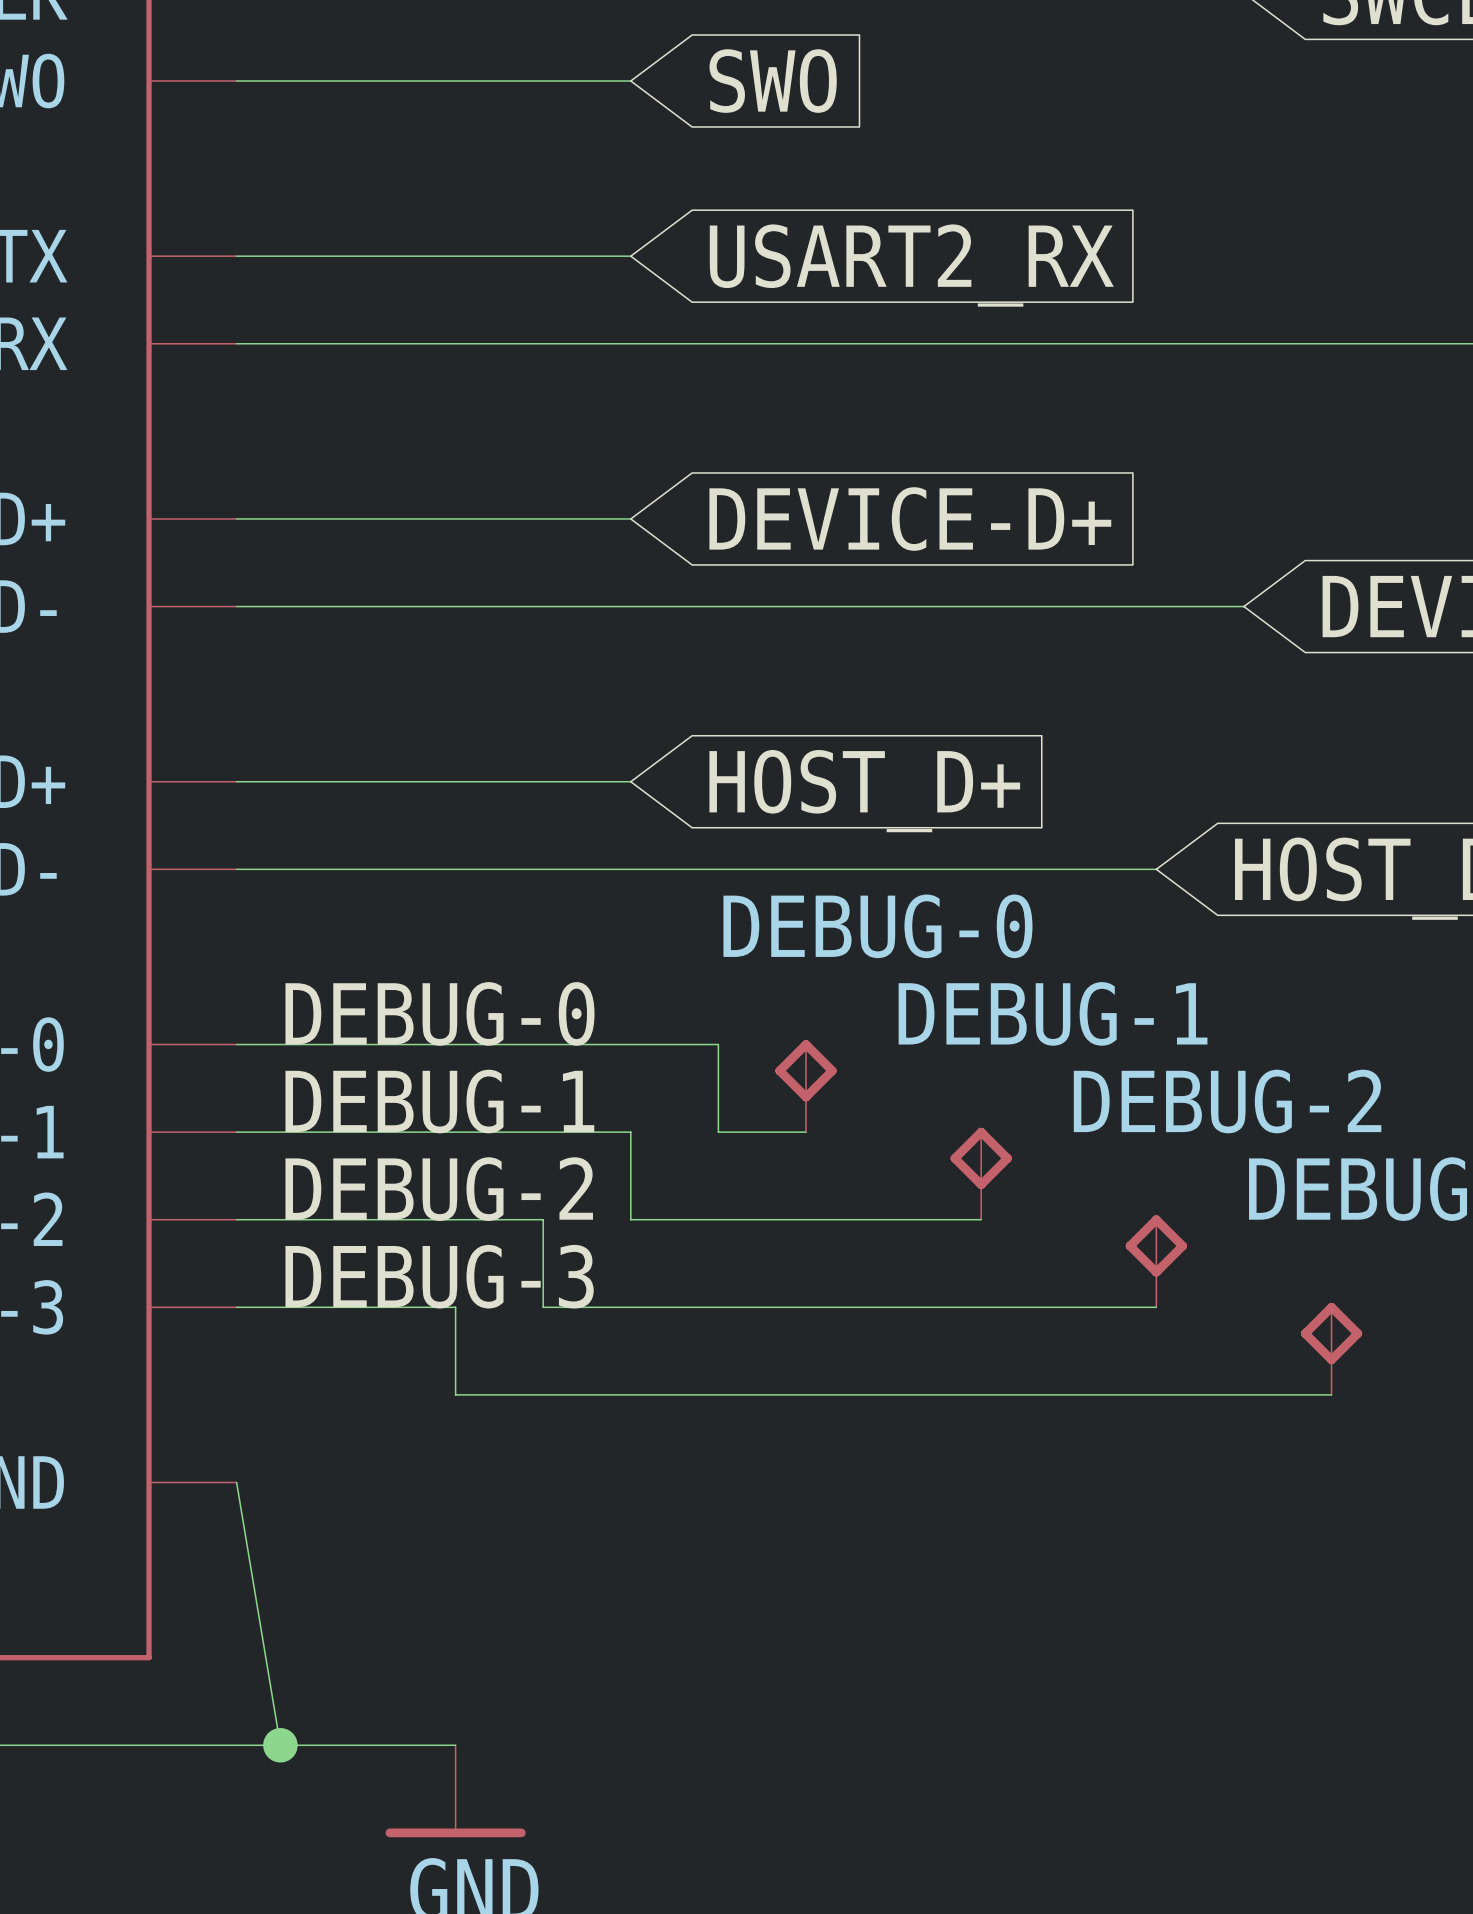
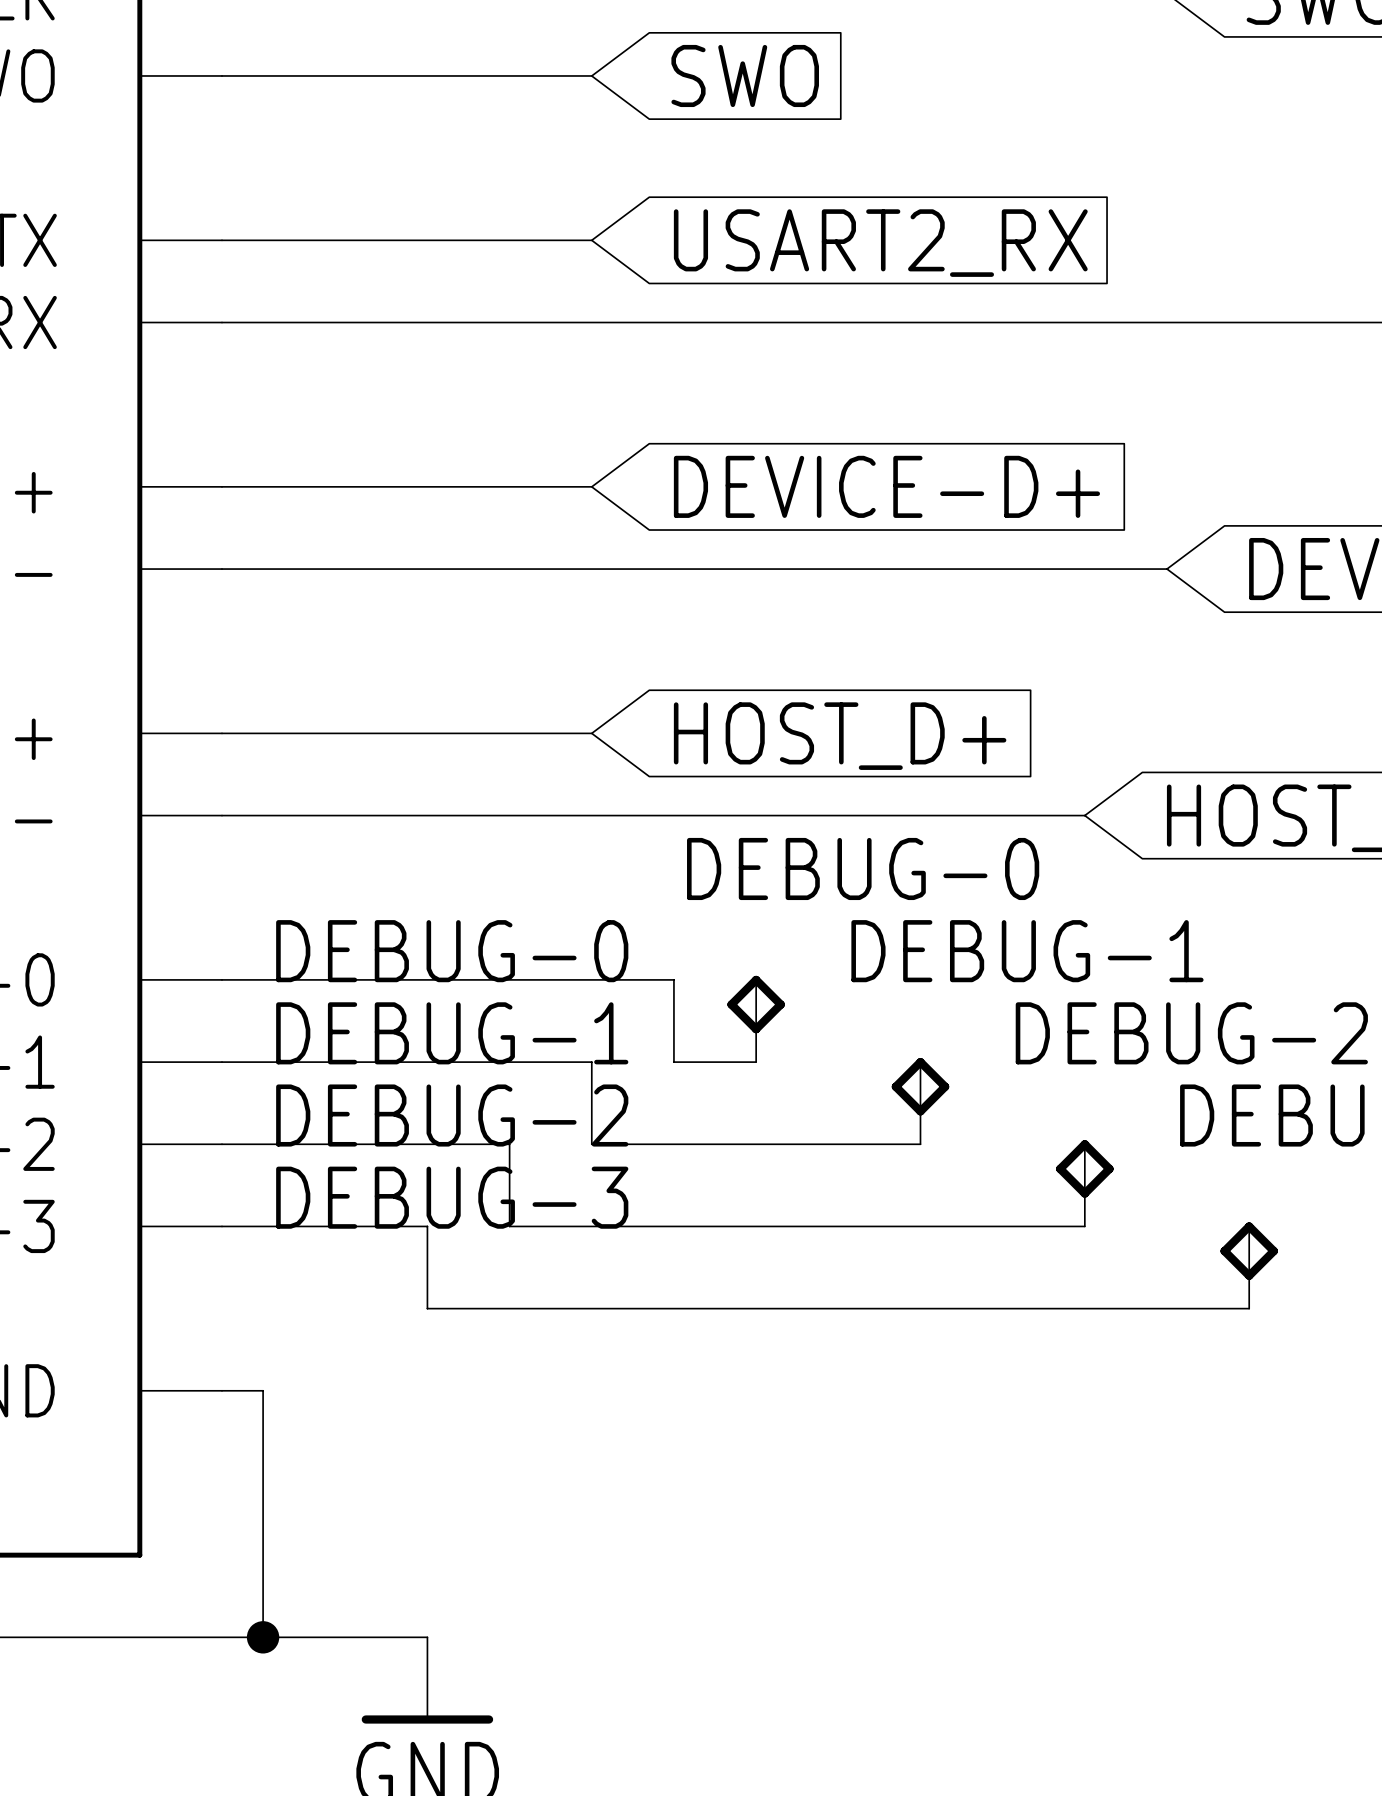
wire: (236, 1482) (280, 1745) -> (221, 1390) (263, 1390) (263, 1637)

